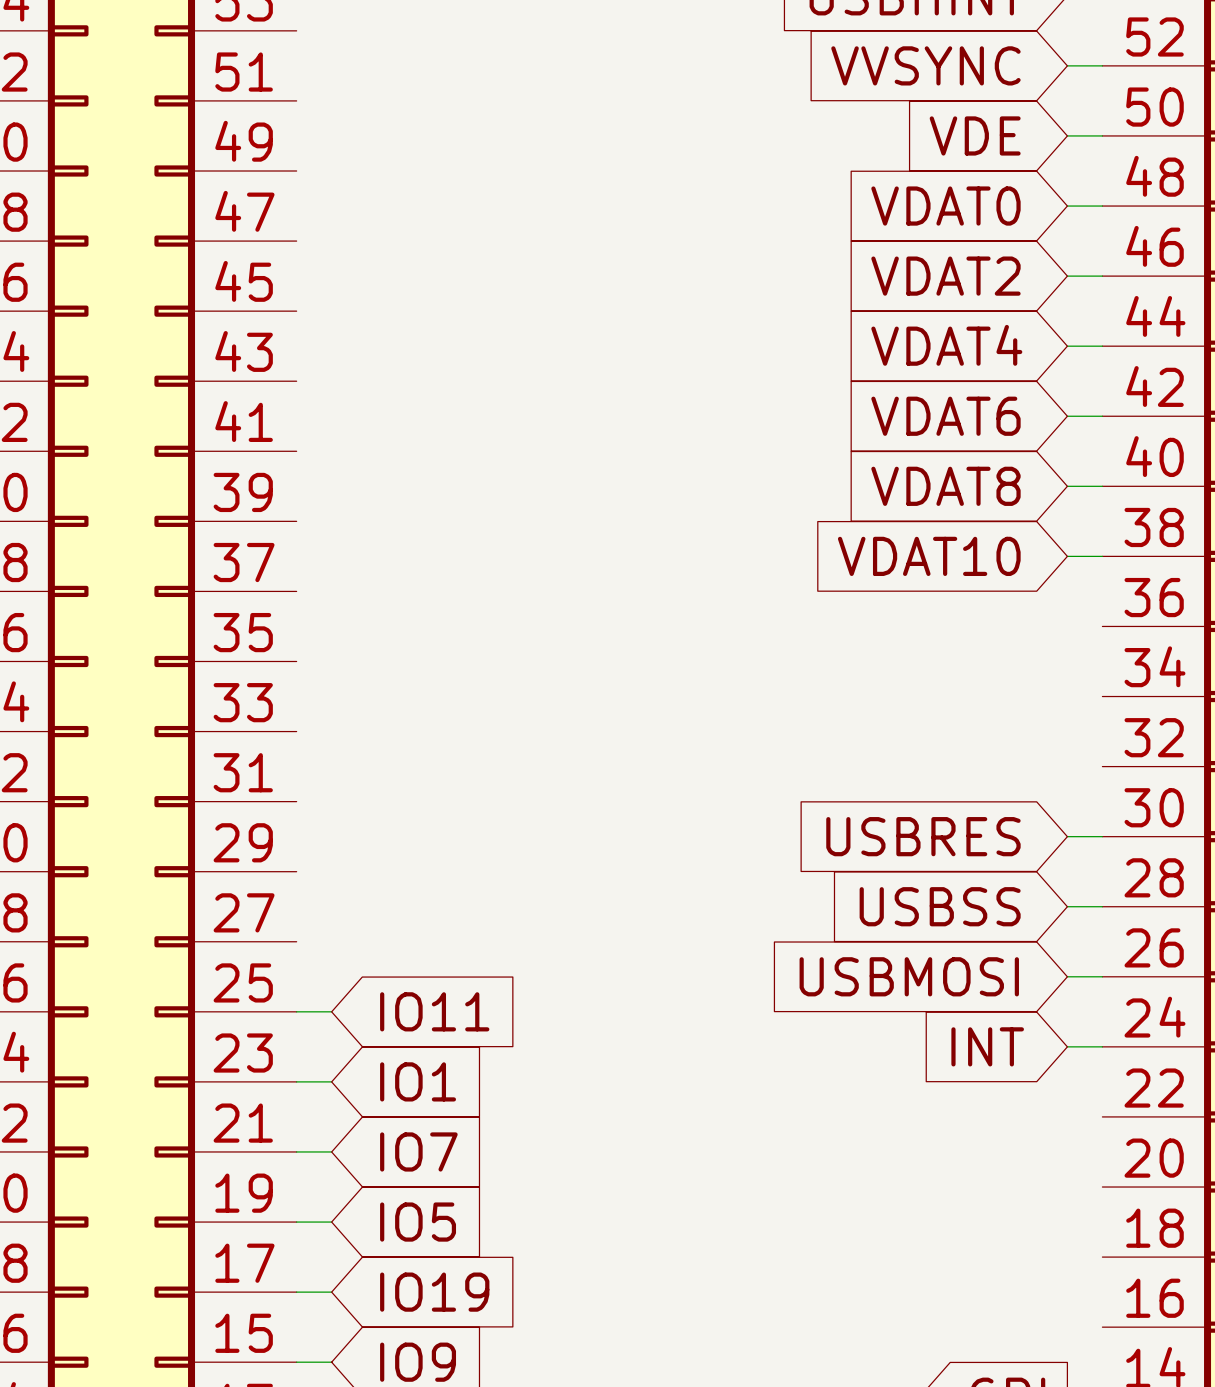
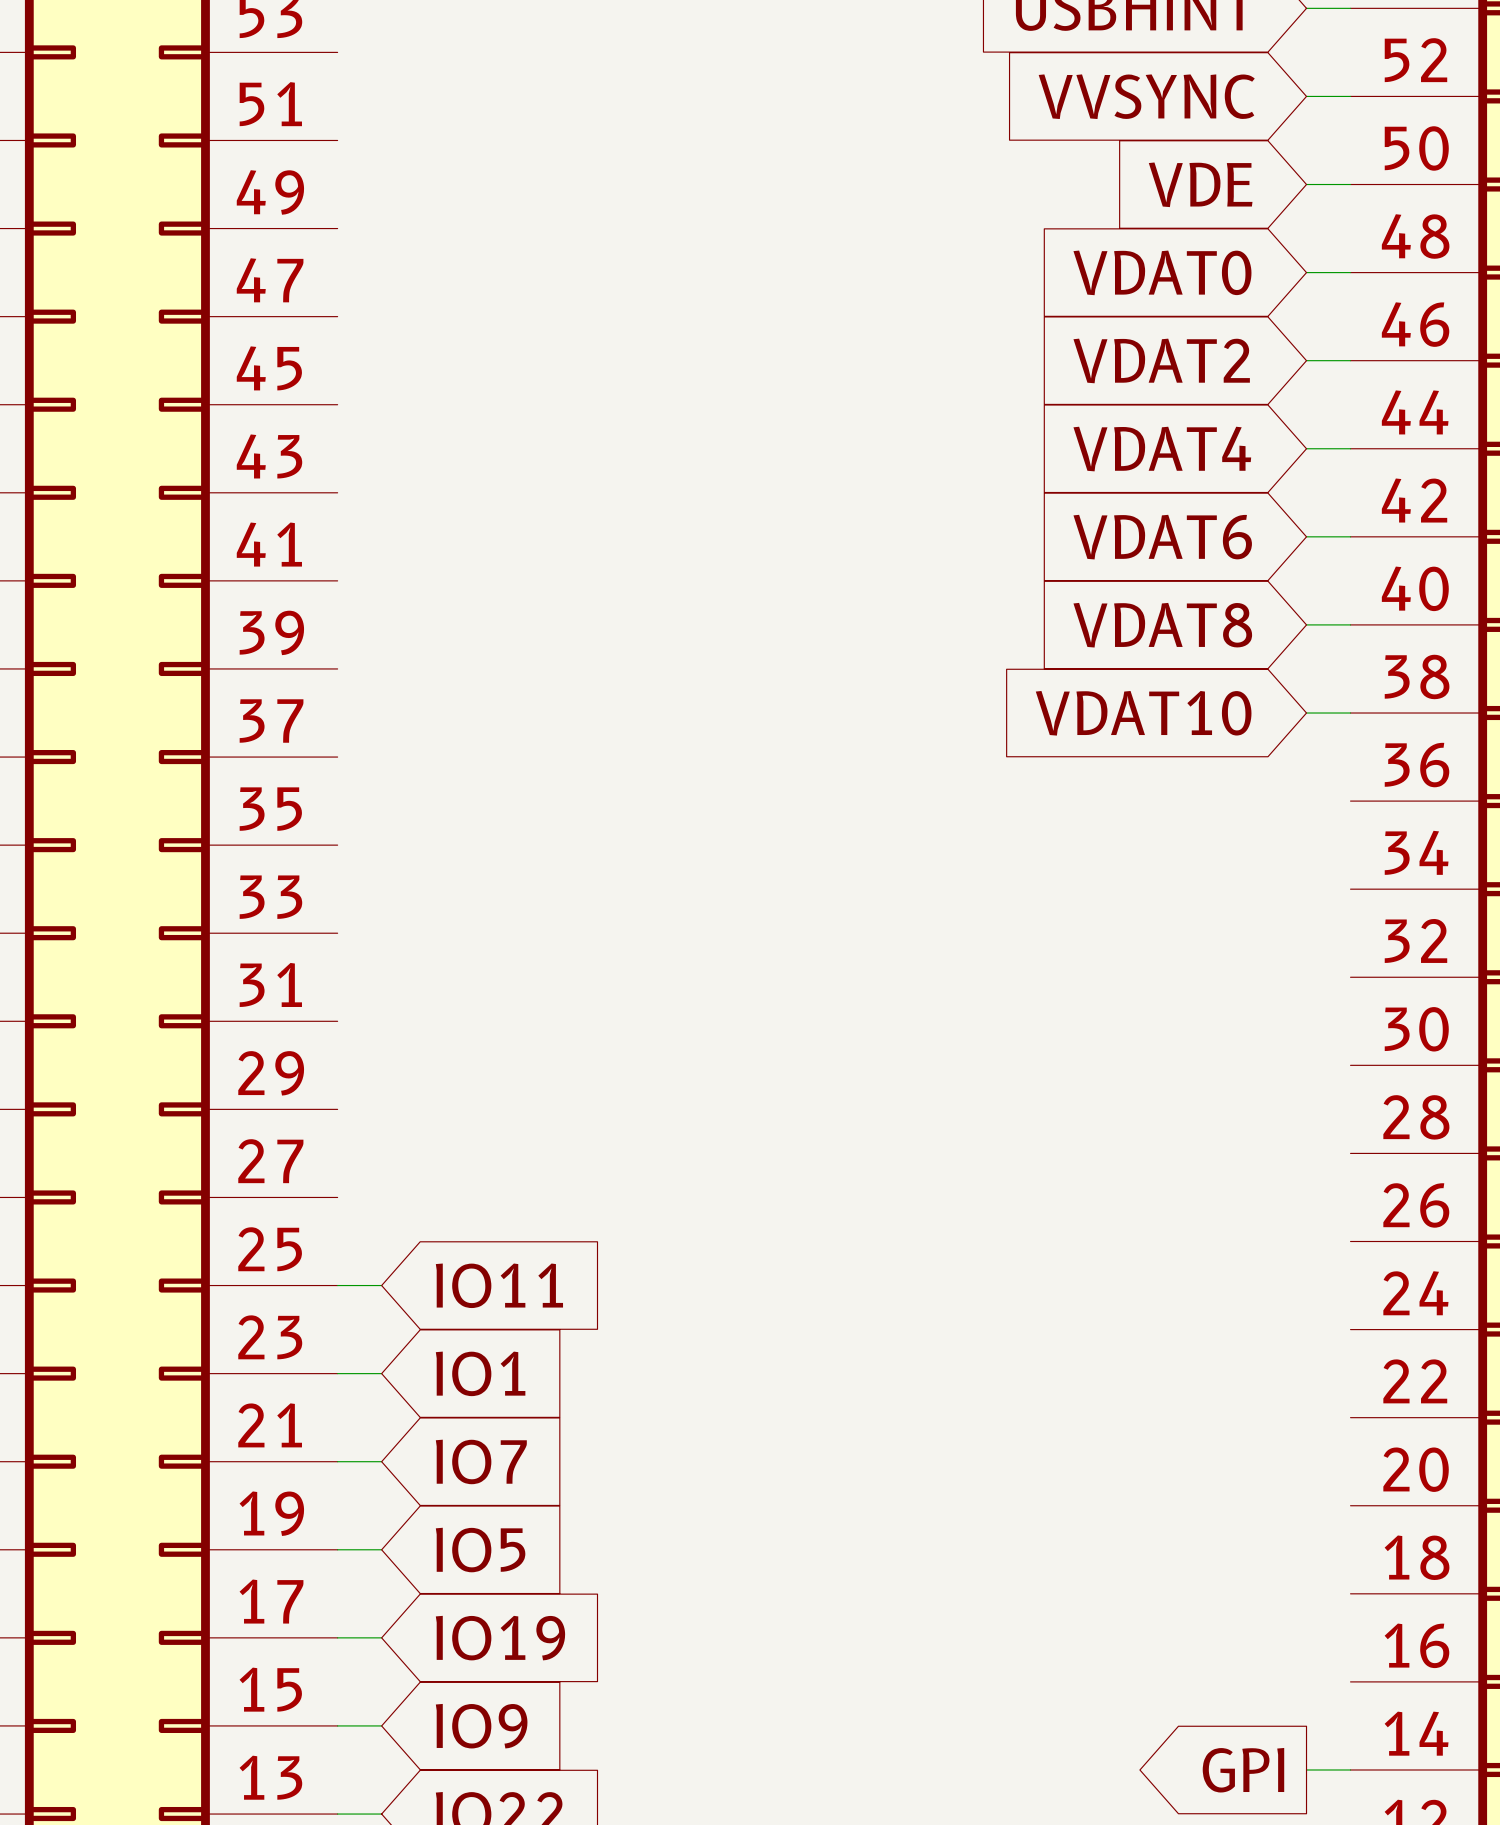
global label: USBRES (923, 836) -> none
wire: (1067, 836) (1102, 836) -> none
global label: USBSS (940, 906) -> none
wire: (1067, 906) (1102, 906) -> none
global label: USBMOSI (909, 976) -> none
wire: (1067, 976) (1102, 976) -> none
global label: INT (987, 1046) -> none
wire: (1067, 1046) (1102, 1046) -> none

